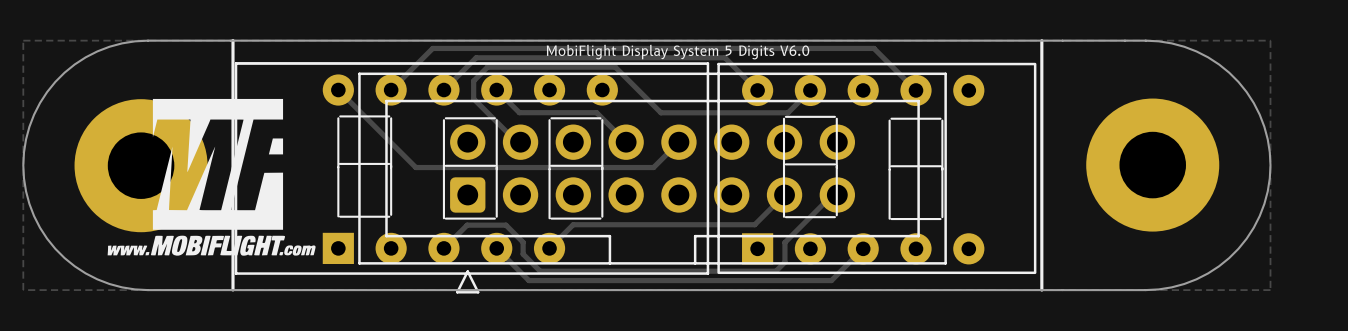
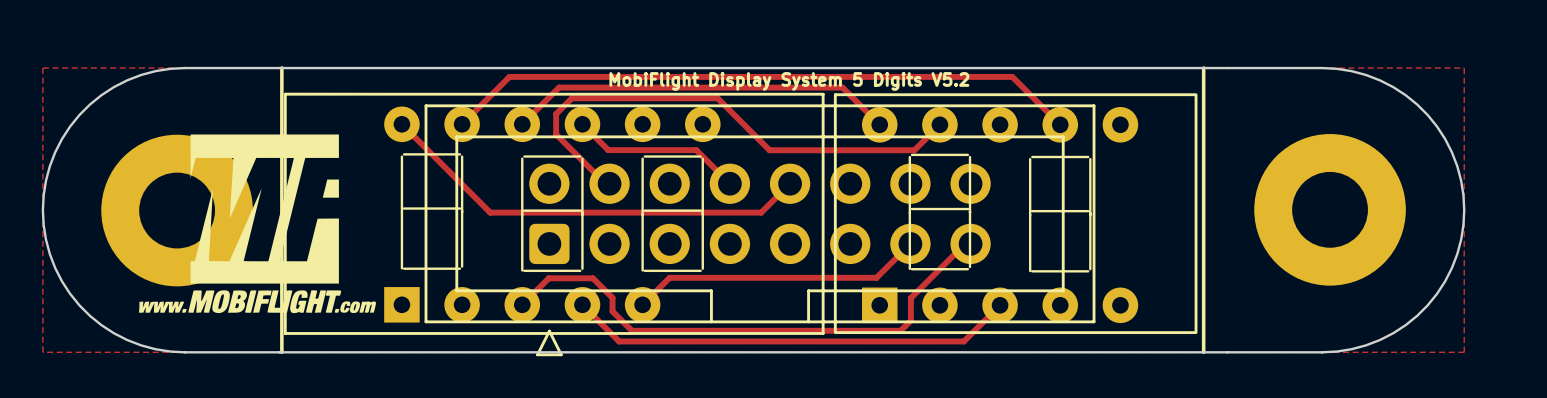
text: MobiFlight Display System 5 Digits V6.0 (678, 52) -> MobiFlight Display System 5 Digits V5.2 (789, 81)

